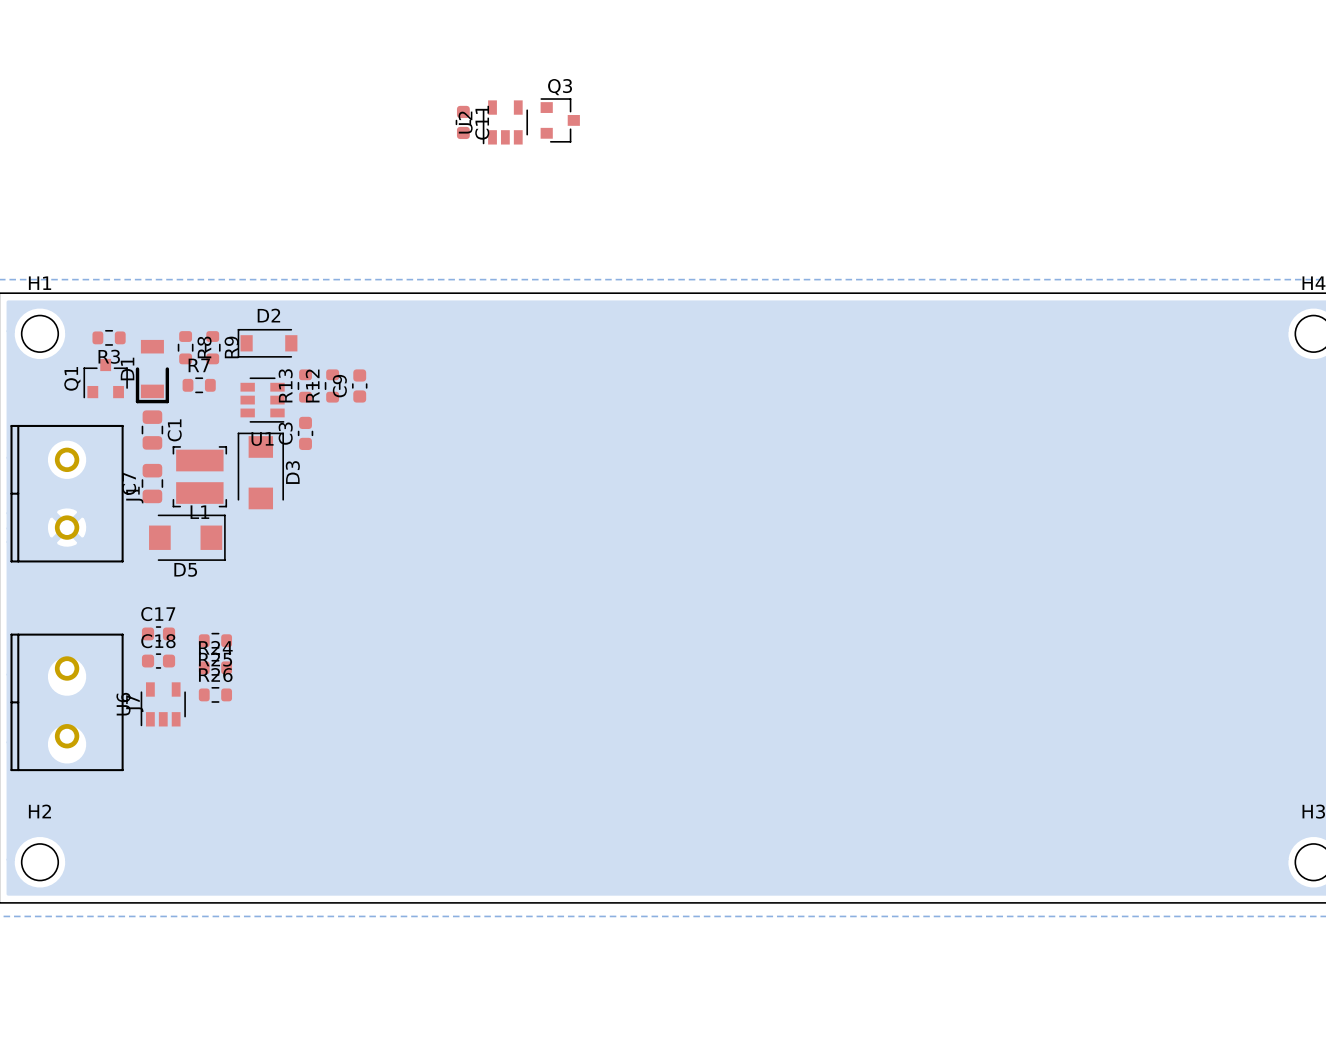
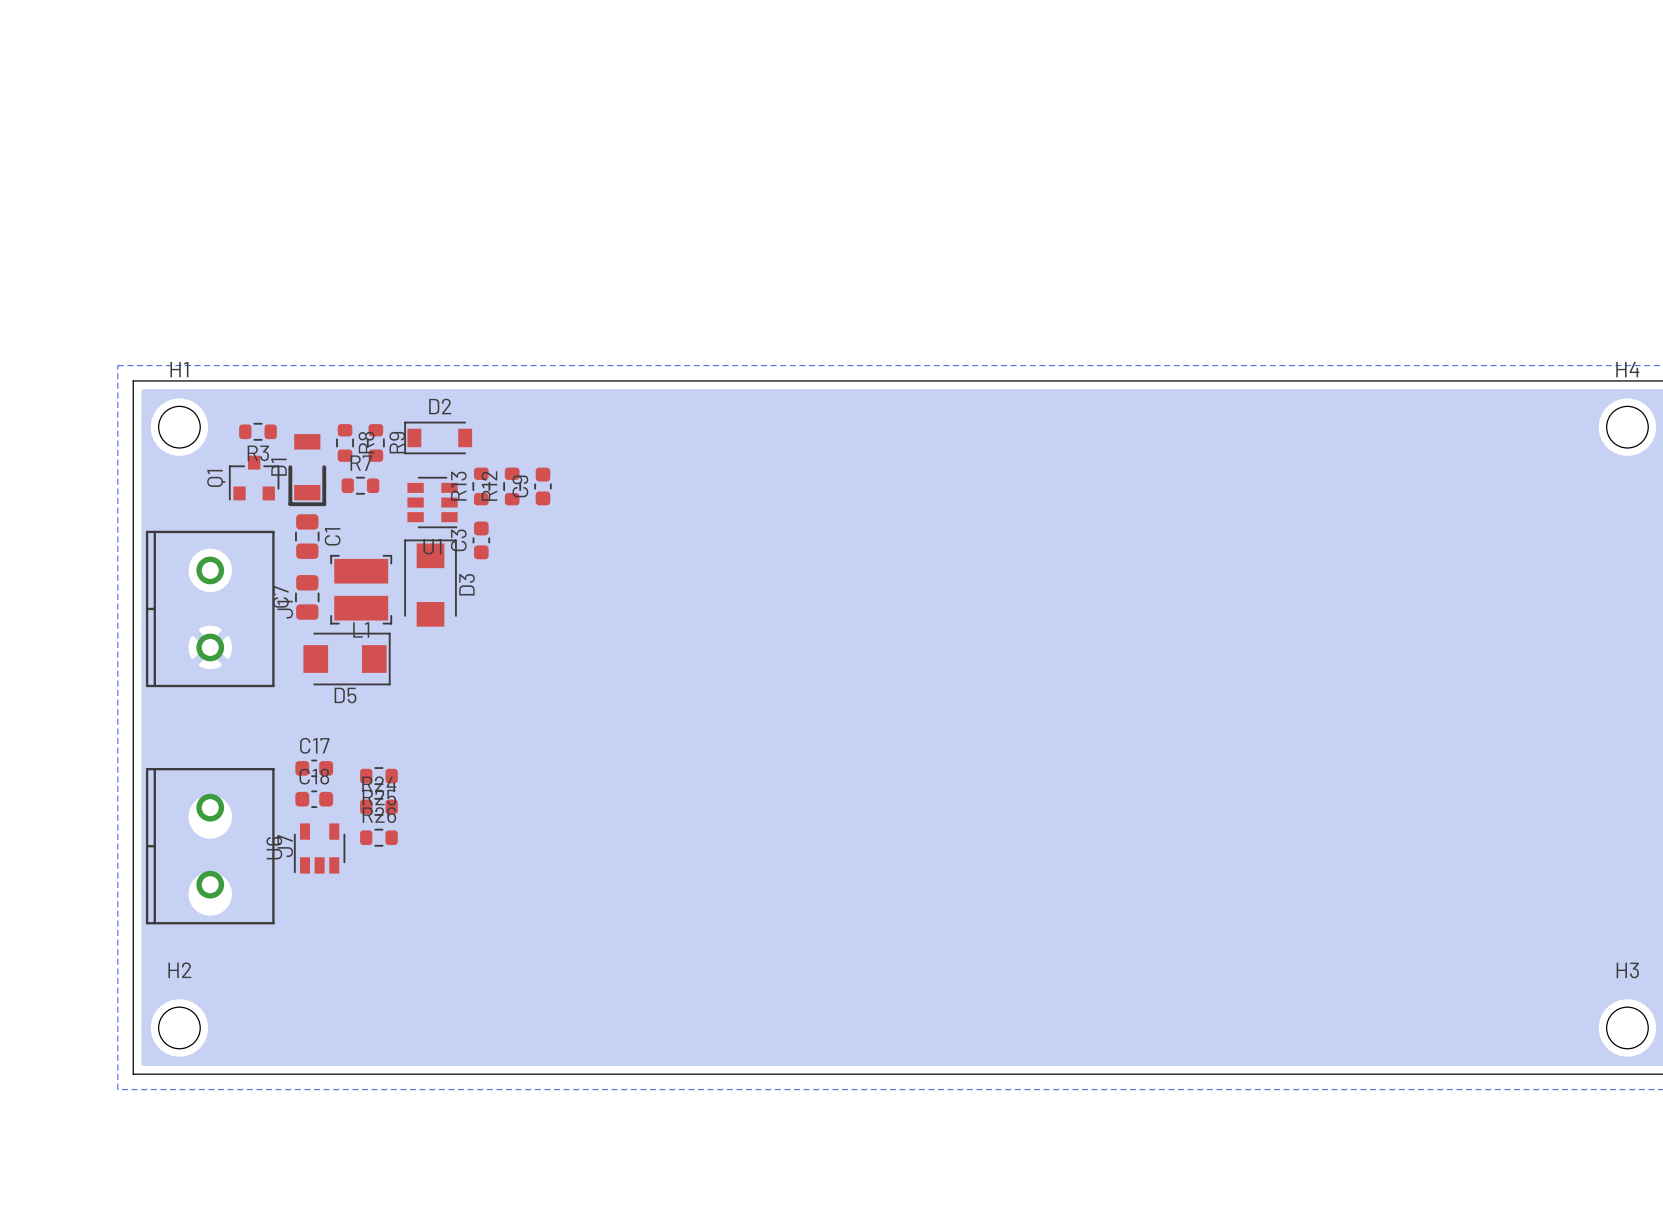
Q3: (560, 120) -> none
C11: (463, 122) -> none
U2: (505, 122) -> none

